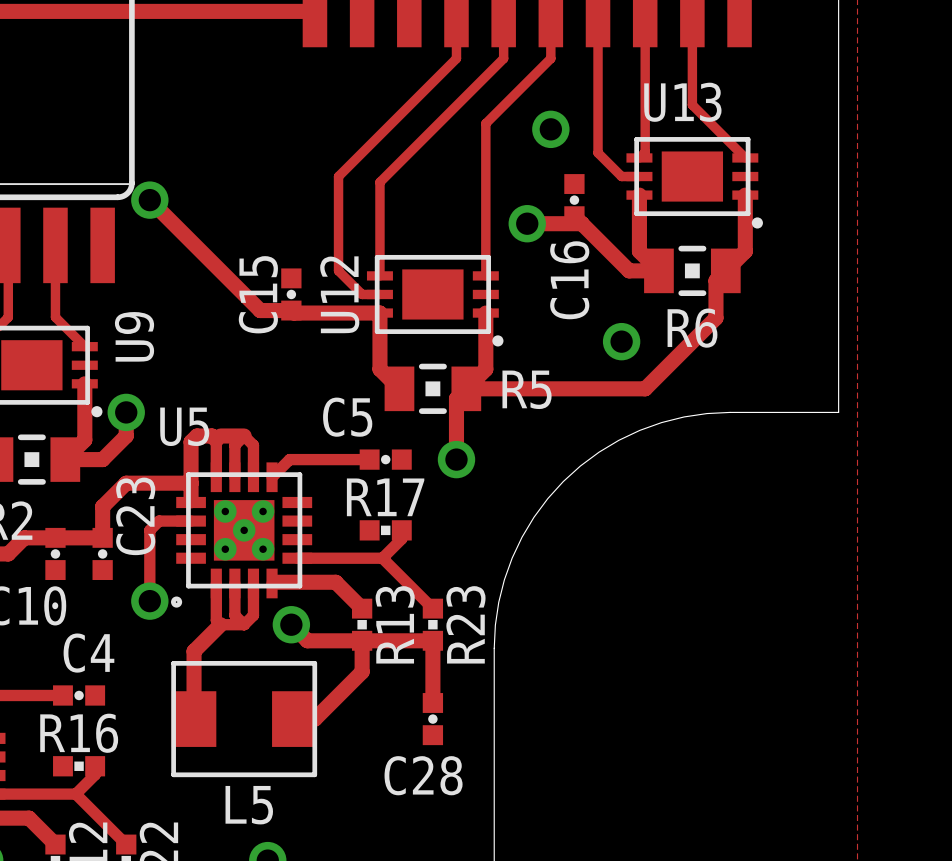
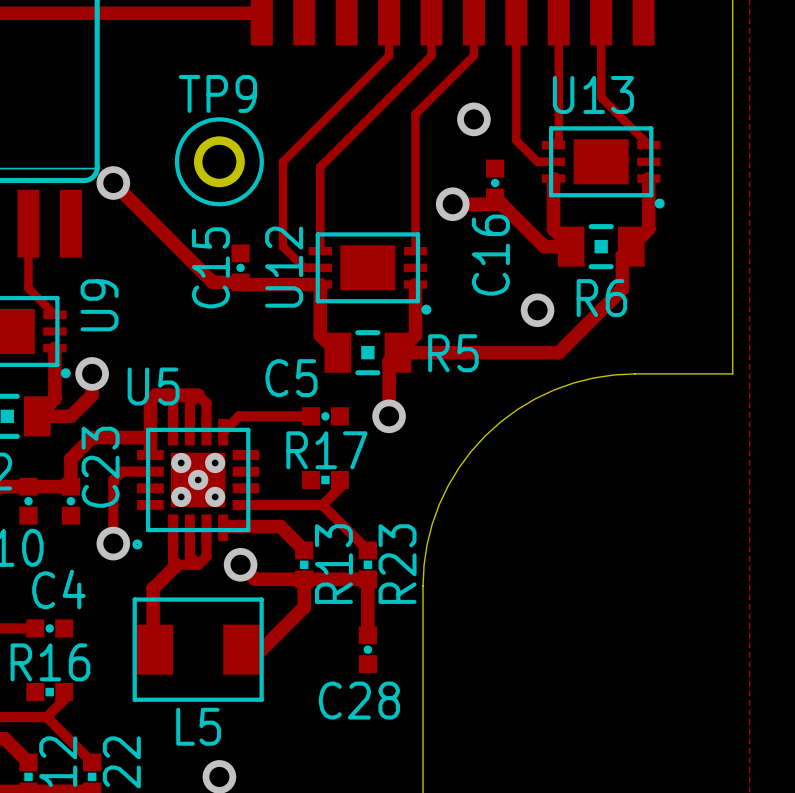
TP9: none -> (219, 161)

